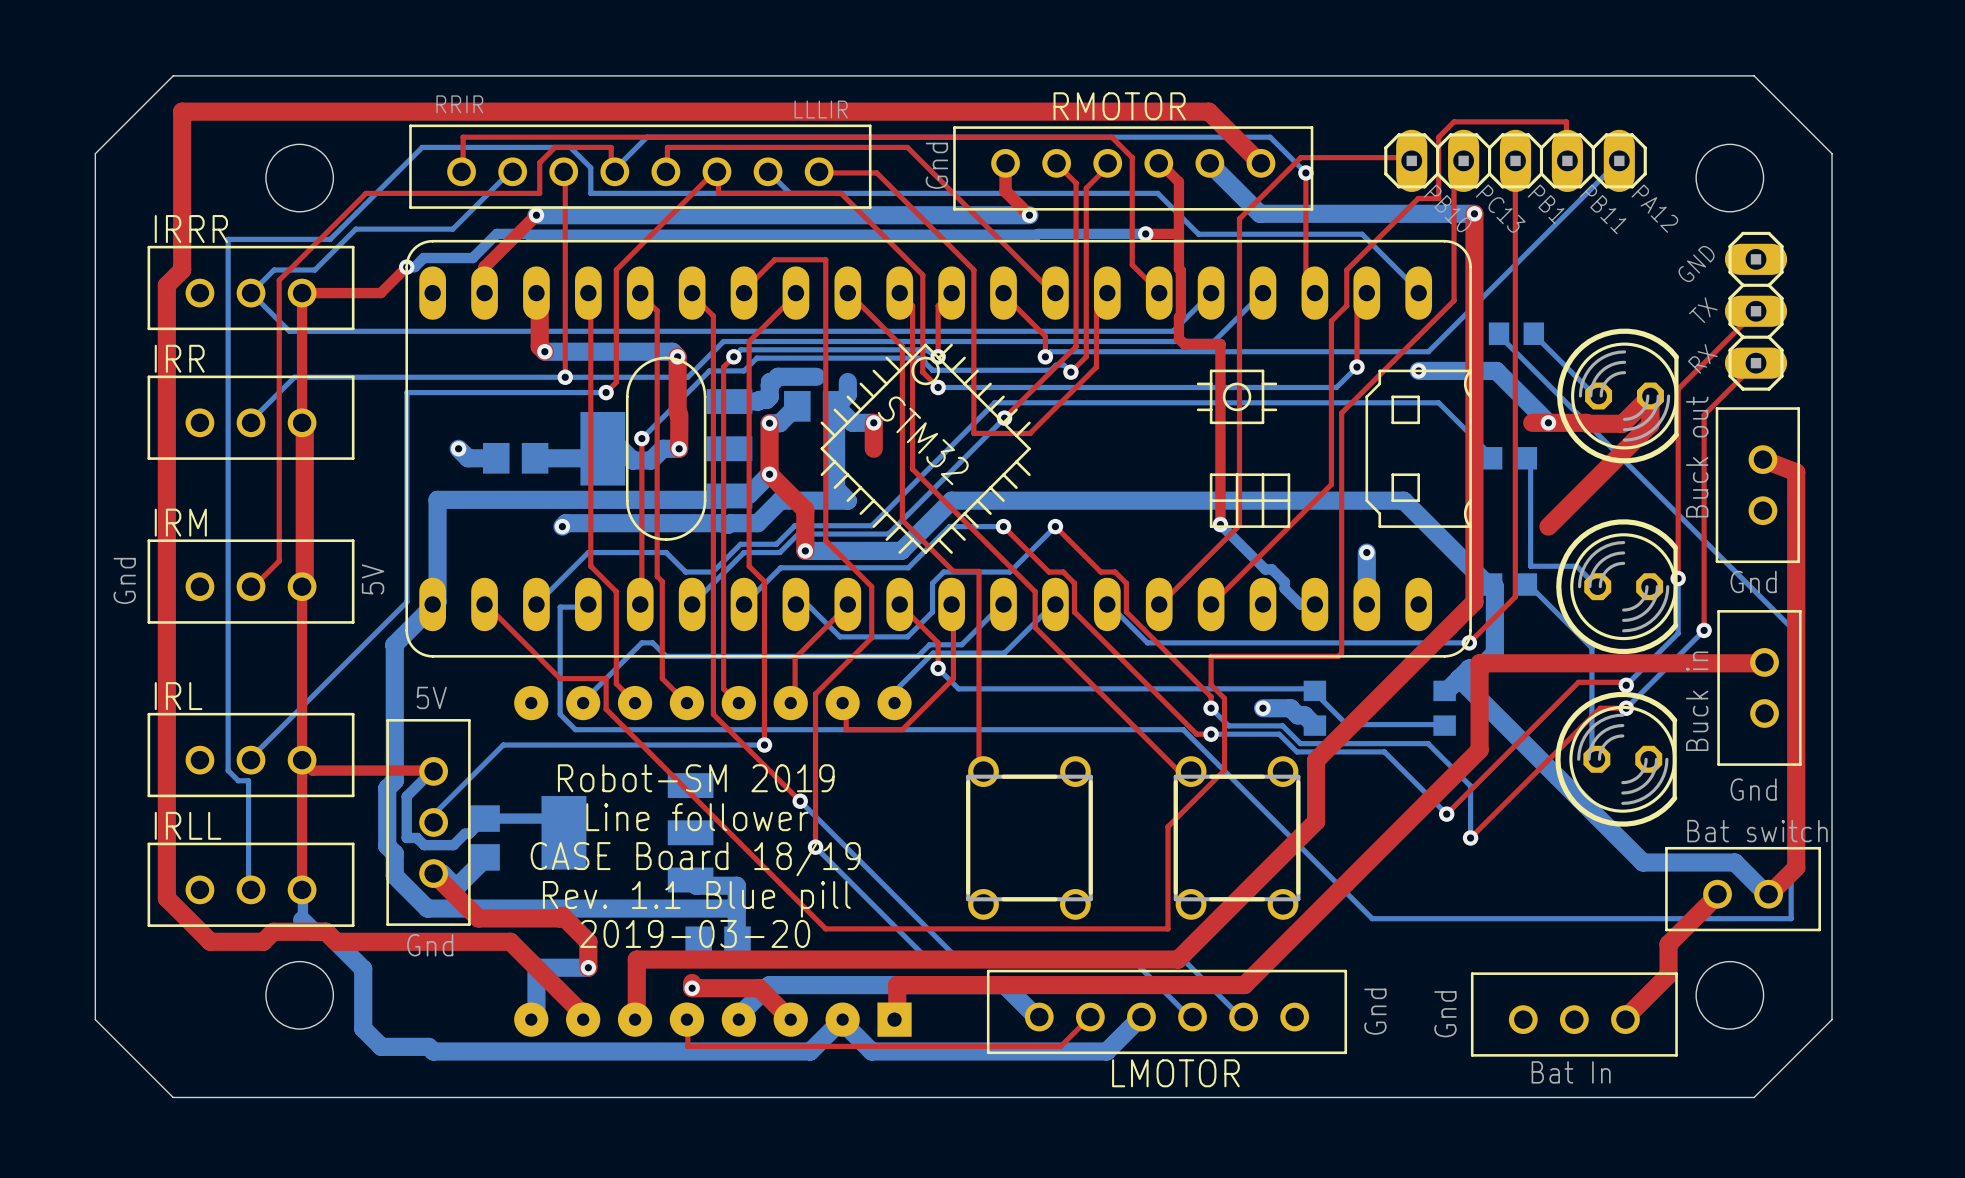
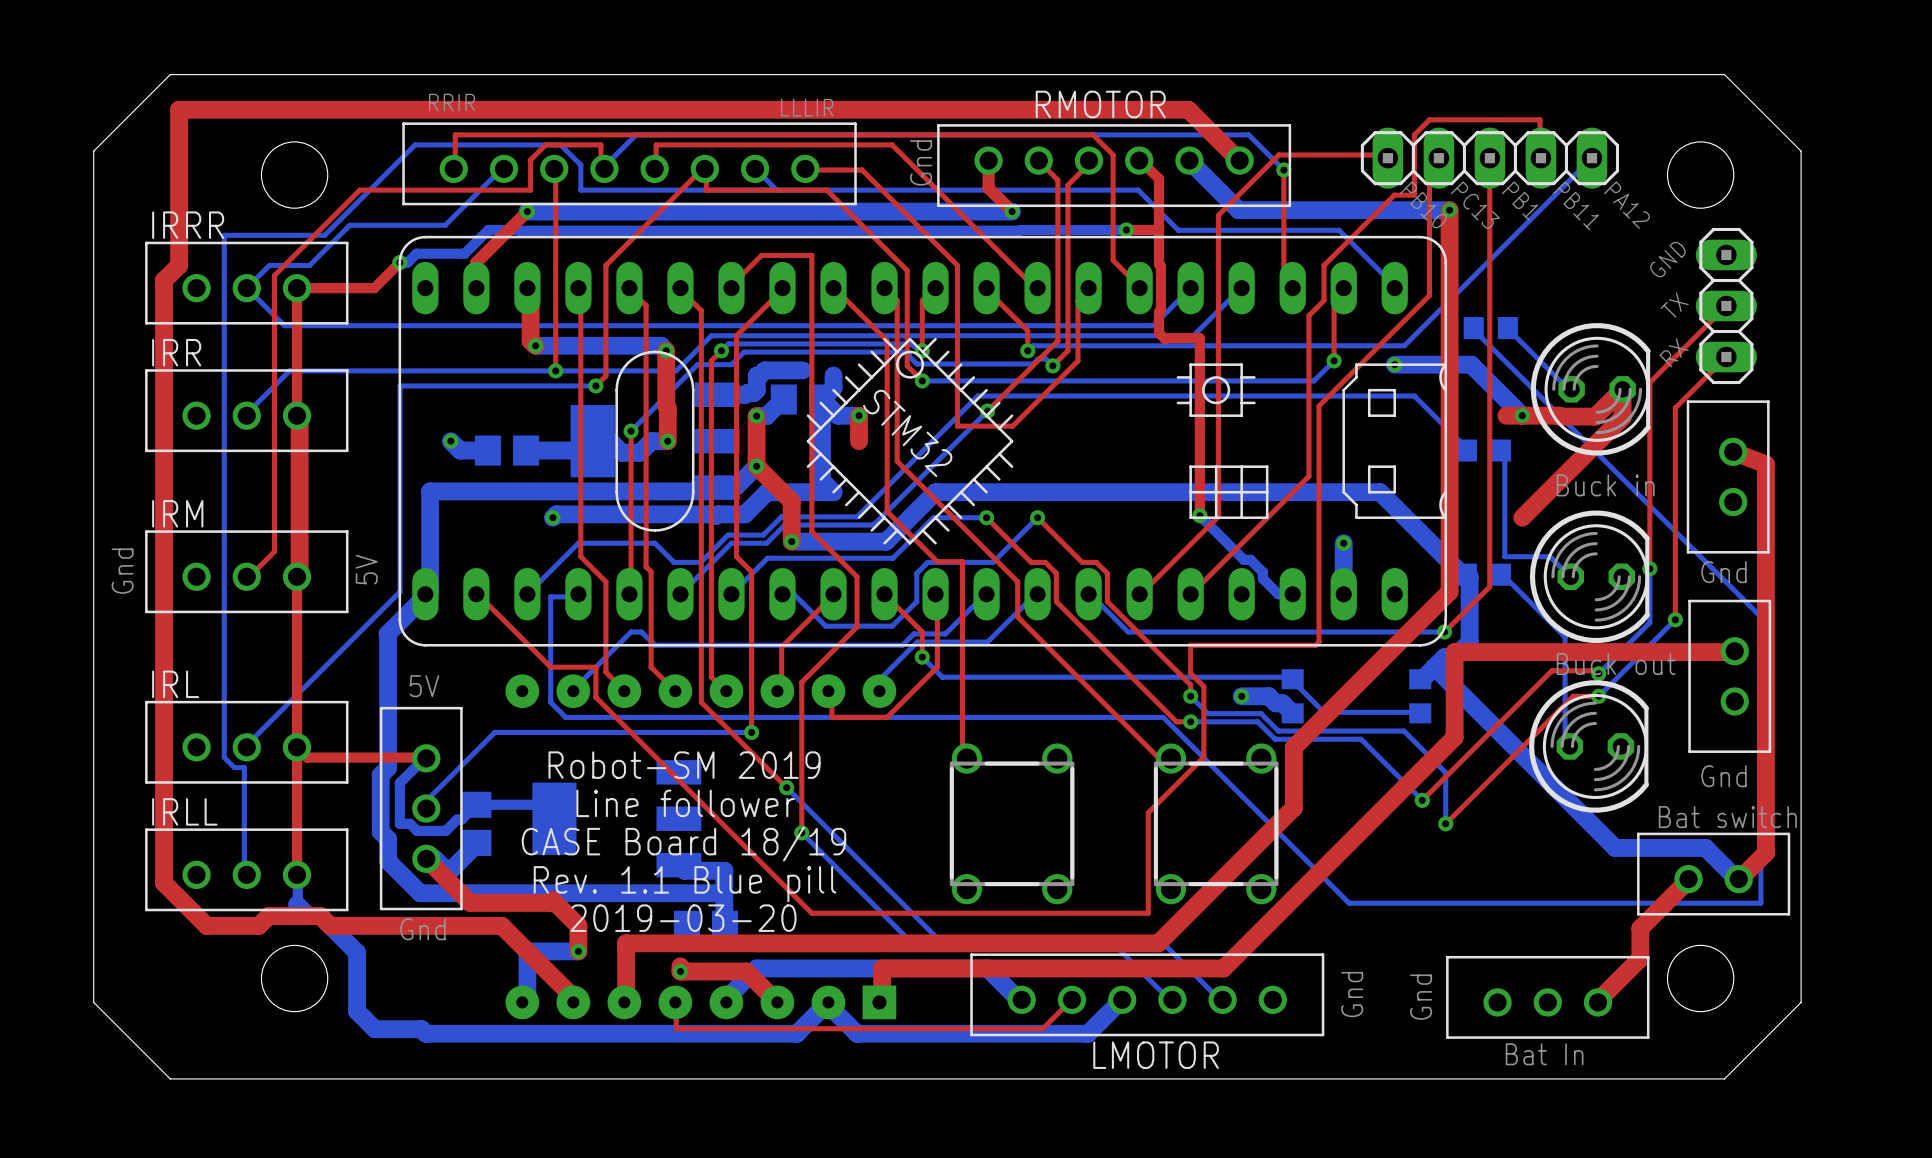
text rotation: 0° (1697, 457) -> 90° clockwise (1616, 663)
text position: Buck out (1697, 457) -> Buck out (1616, 663)
text rotation: 0° (1697, 701) -> 90° clockwise (1605, 485)
text position: Buck in (1697, 701) -> Buck in (1605, 485)

